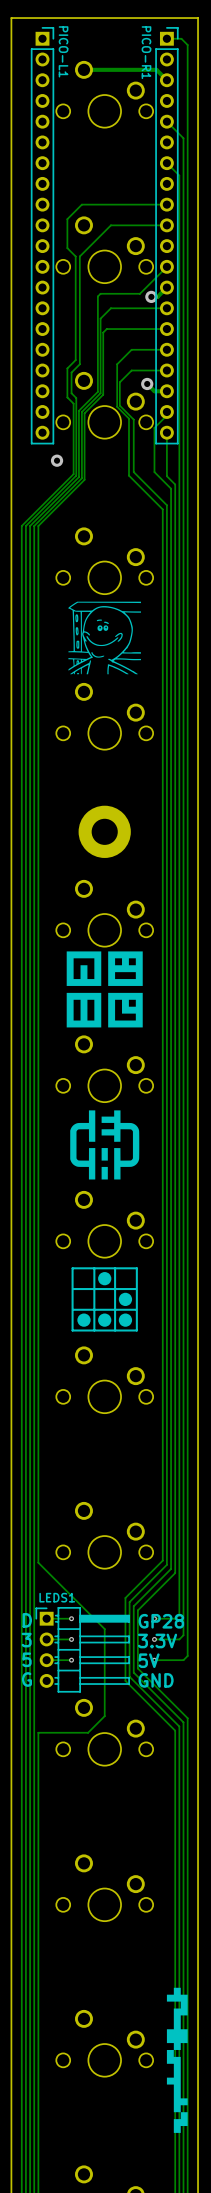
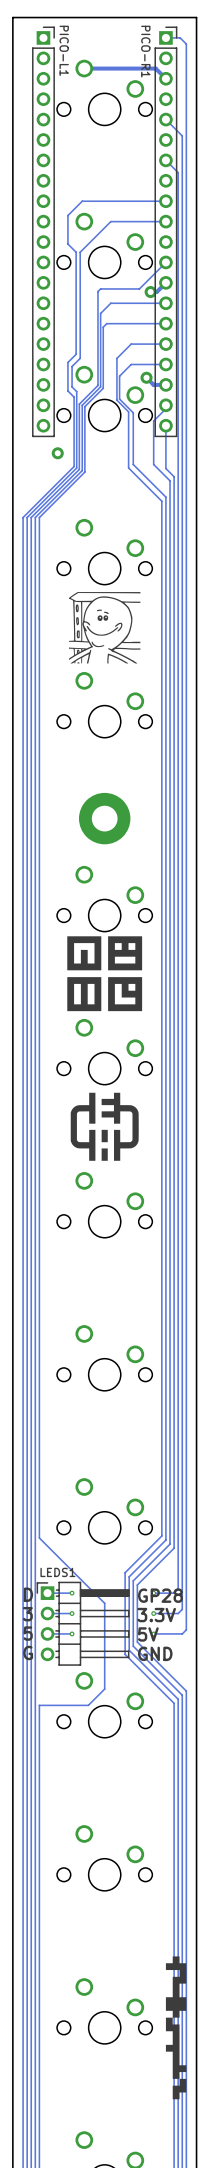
line: (94, 1268) (94, 1330) -> none
line: (115, 1268) (115, 1330) -> none
line: (136, 1268) (72, 1268) (72, 1330) (136, 1330) (136, 1268) -> none
drawing: [98, 1272, 112, 1286] -> none
line: (135, 1289) (73, 1289) -> none
drawing: [77, 1292, 133, 1327] -> none
line: (135, 1309) (73, 1309) -> none

